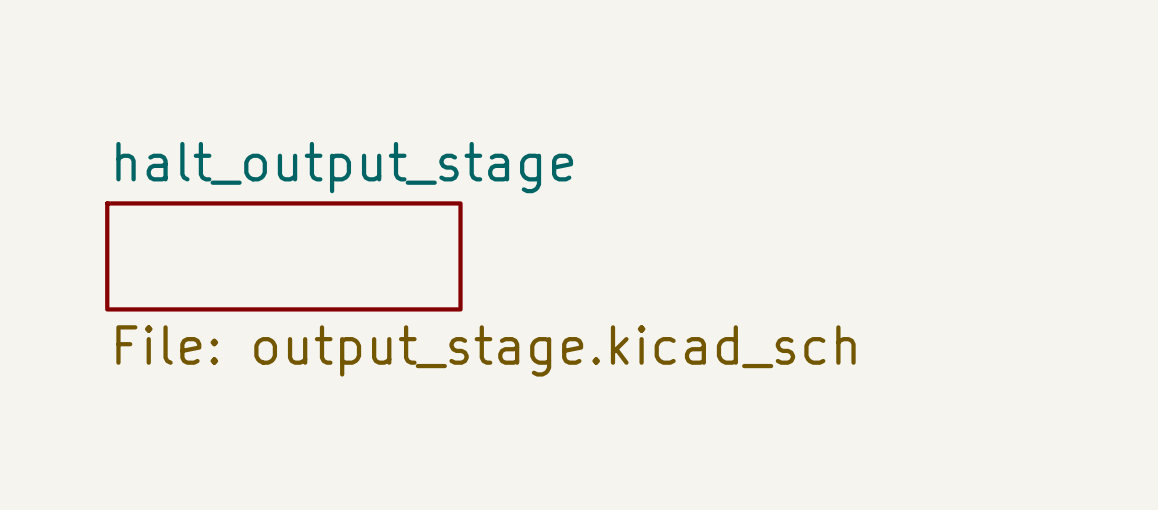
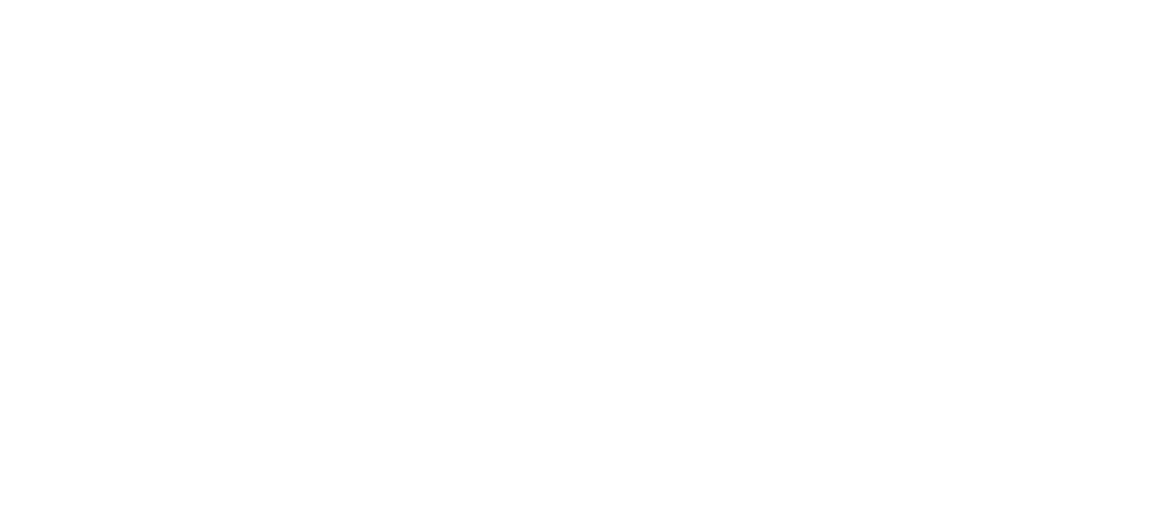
sheet halt_output_stage: File: output_stage.kicad_sch (283, 256) -> none

